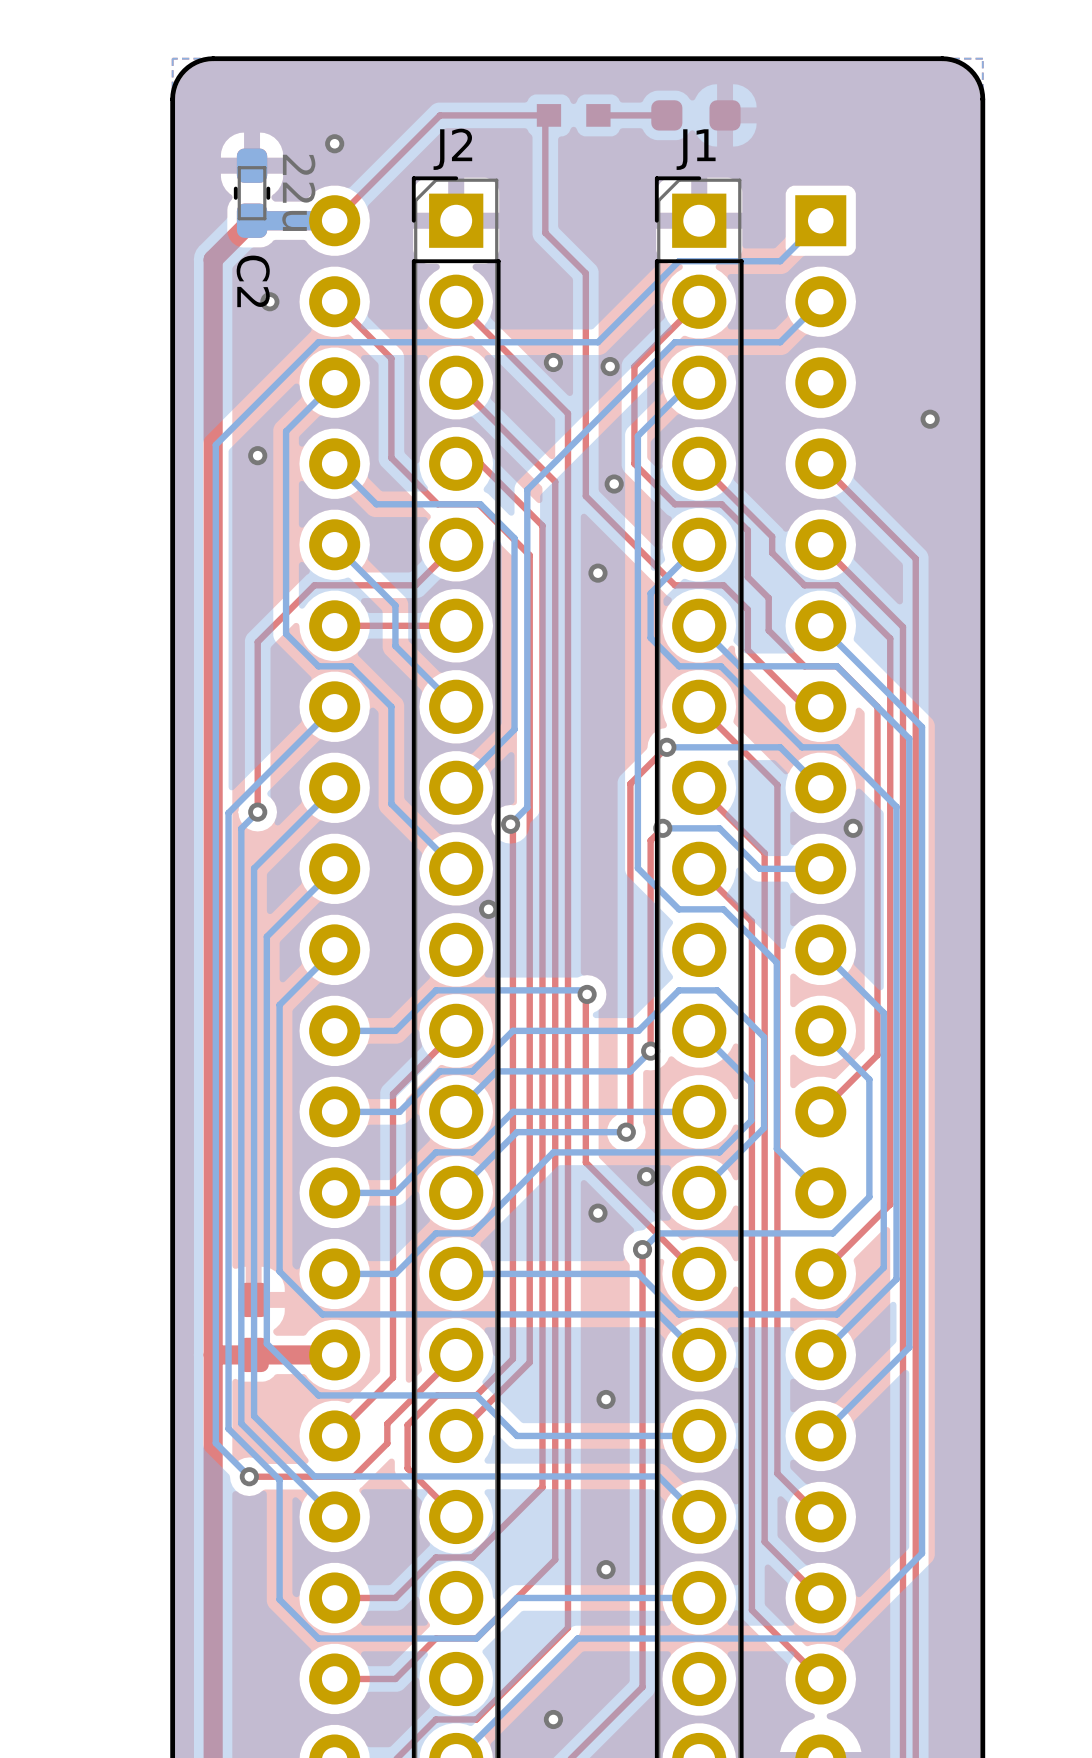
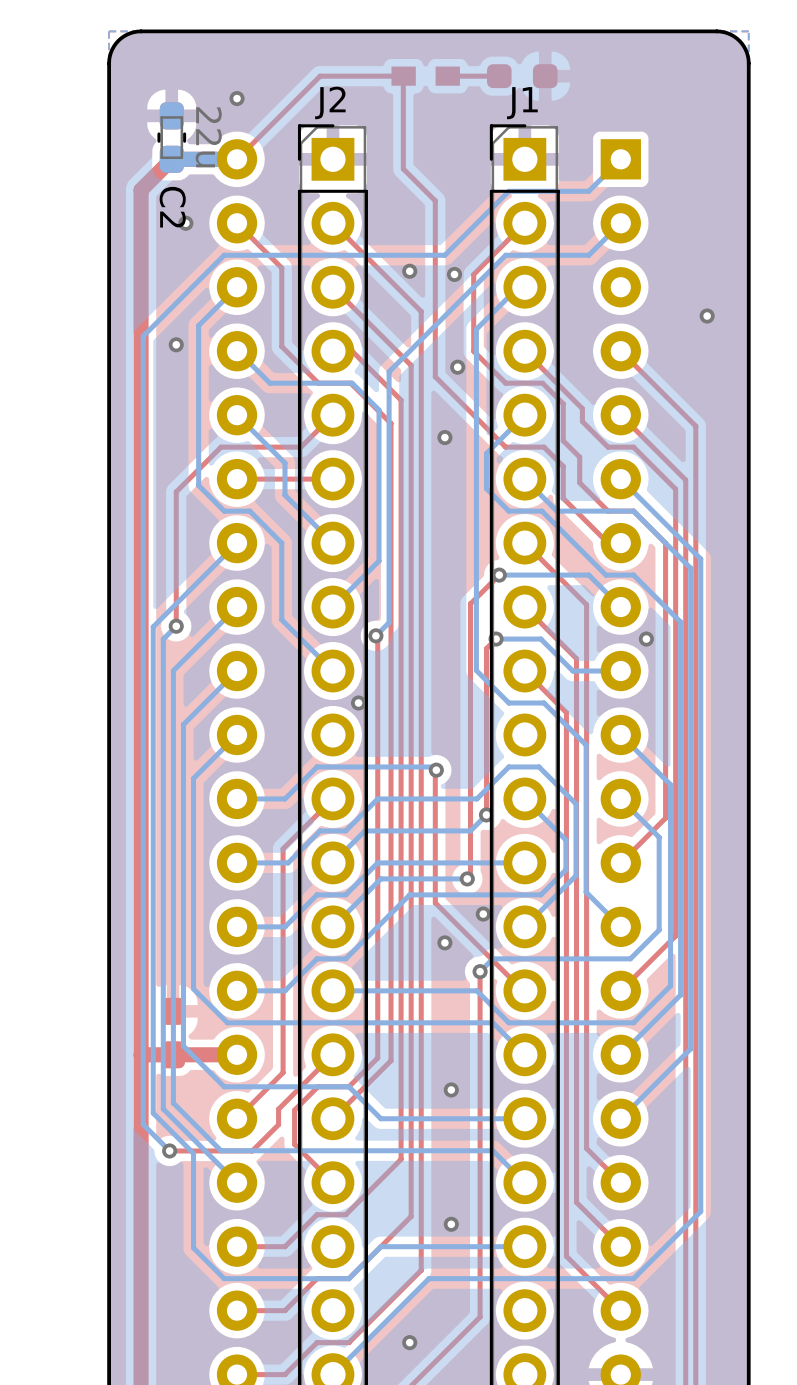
part footprint: [536, 104, 611, 127] -> [391, 66, 460, 86]

